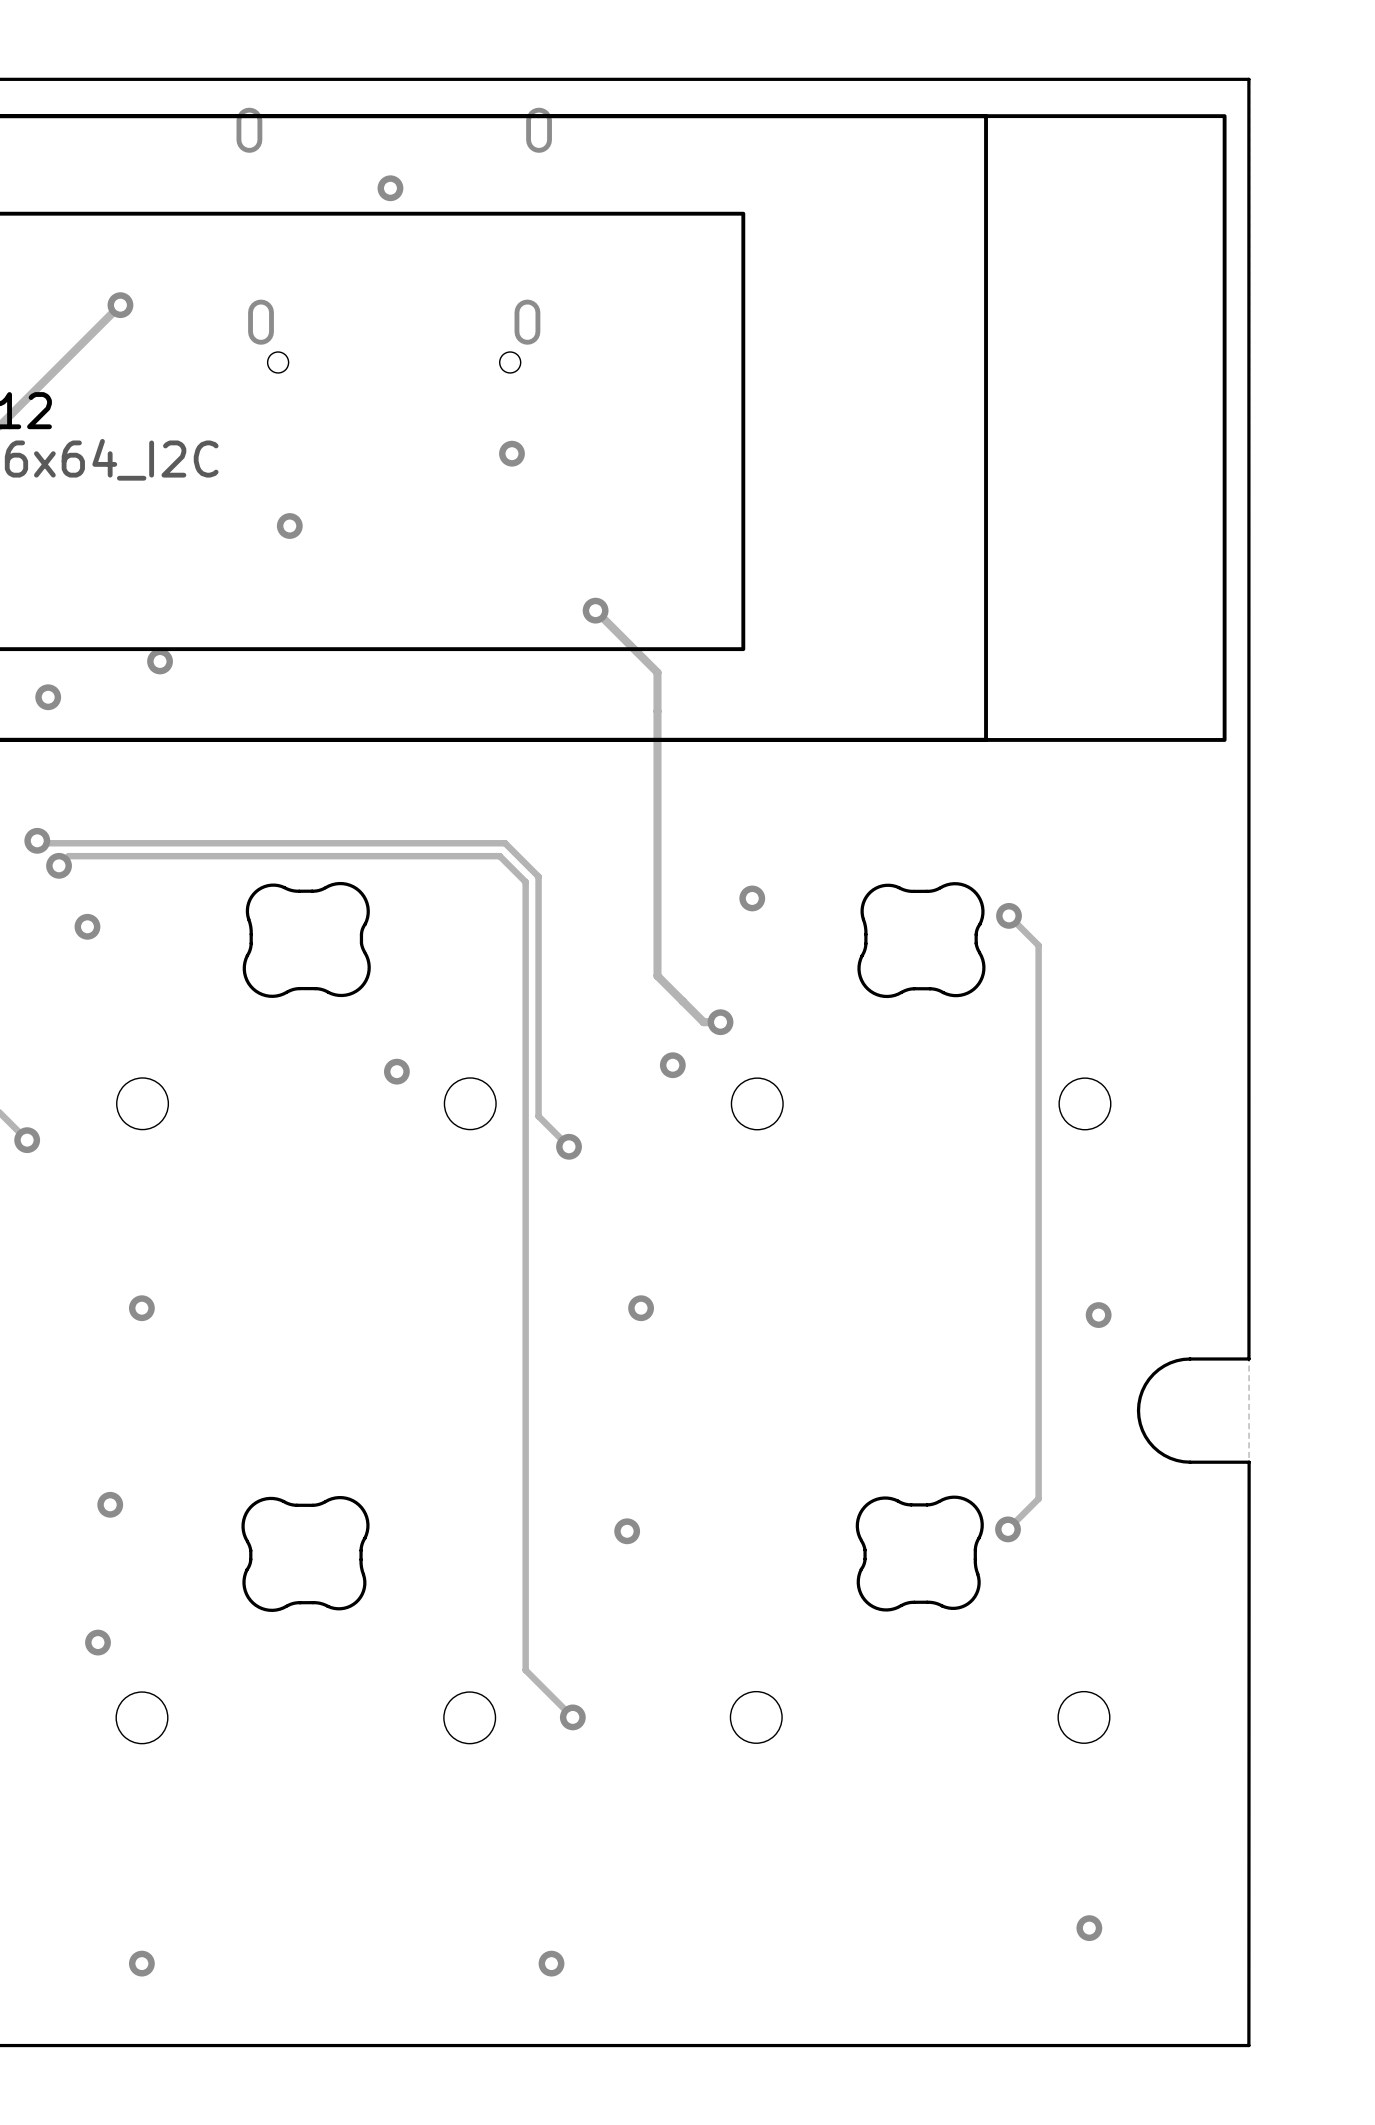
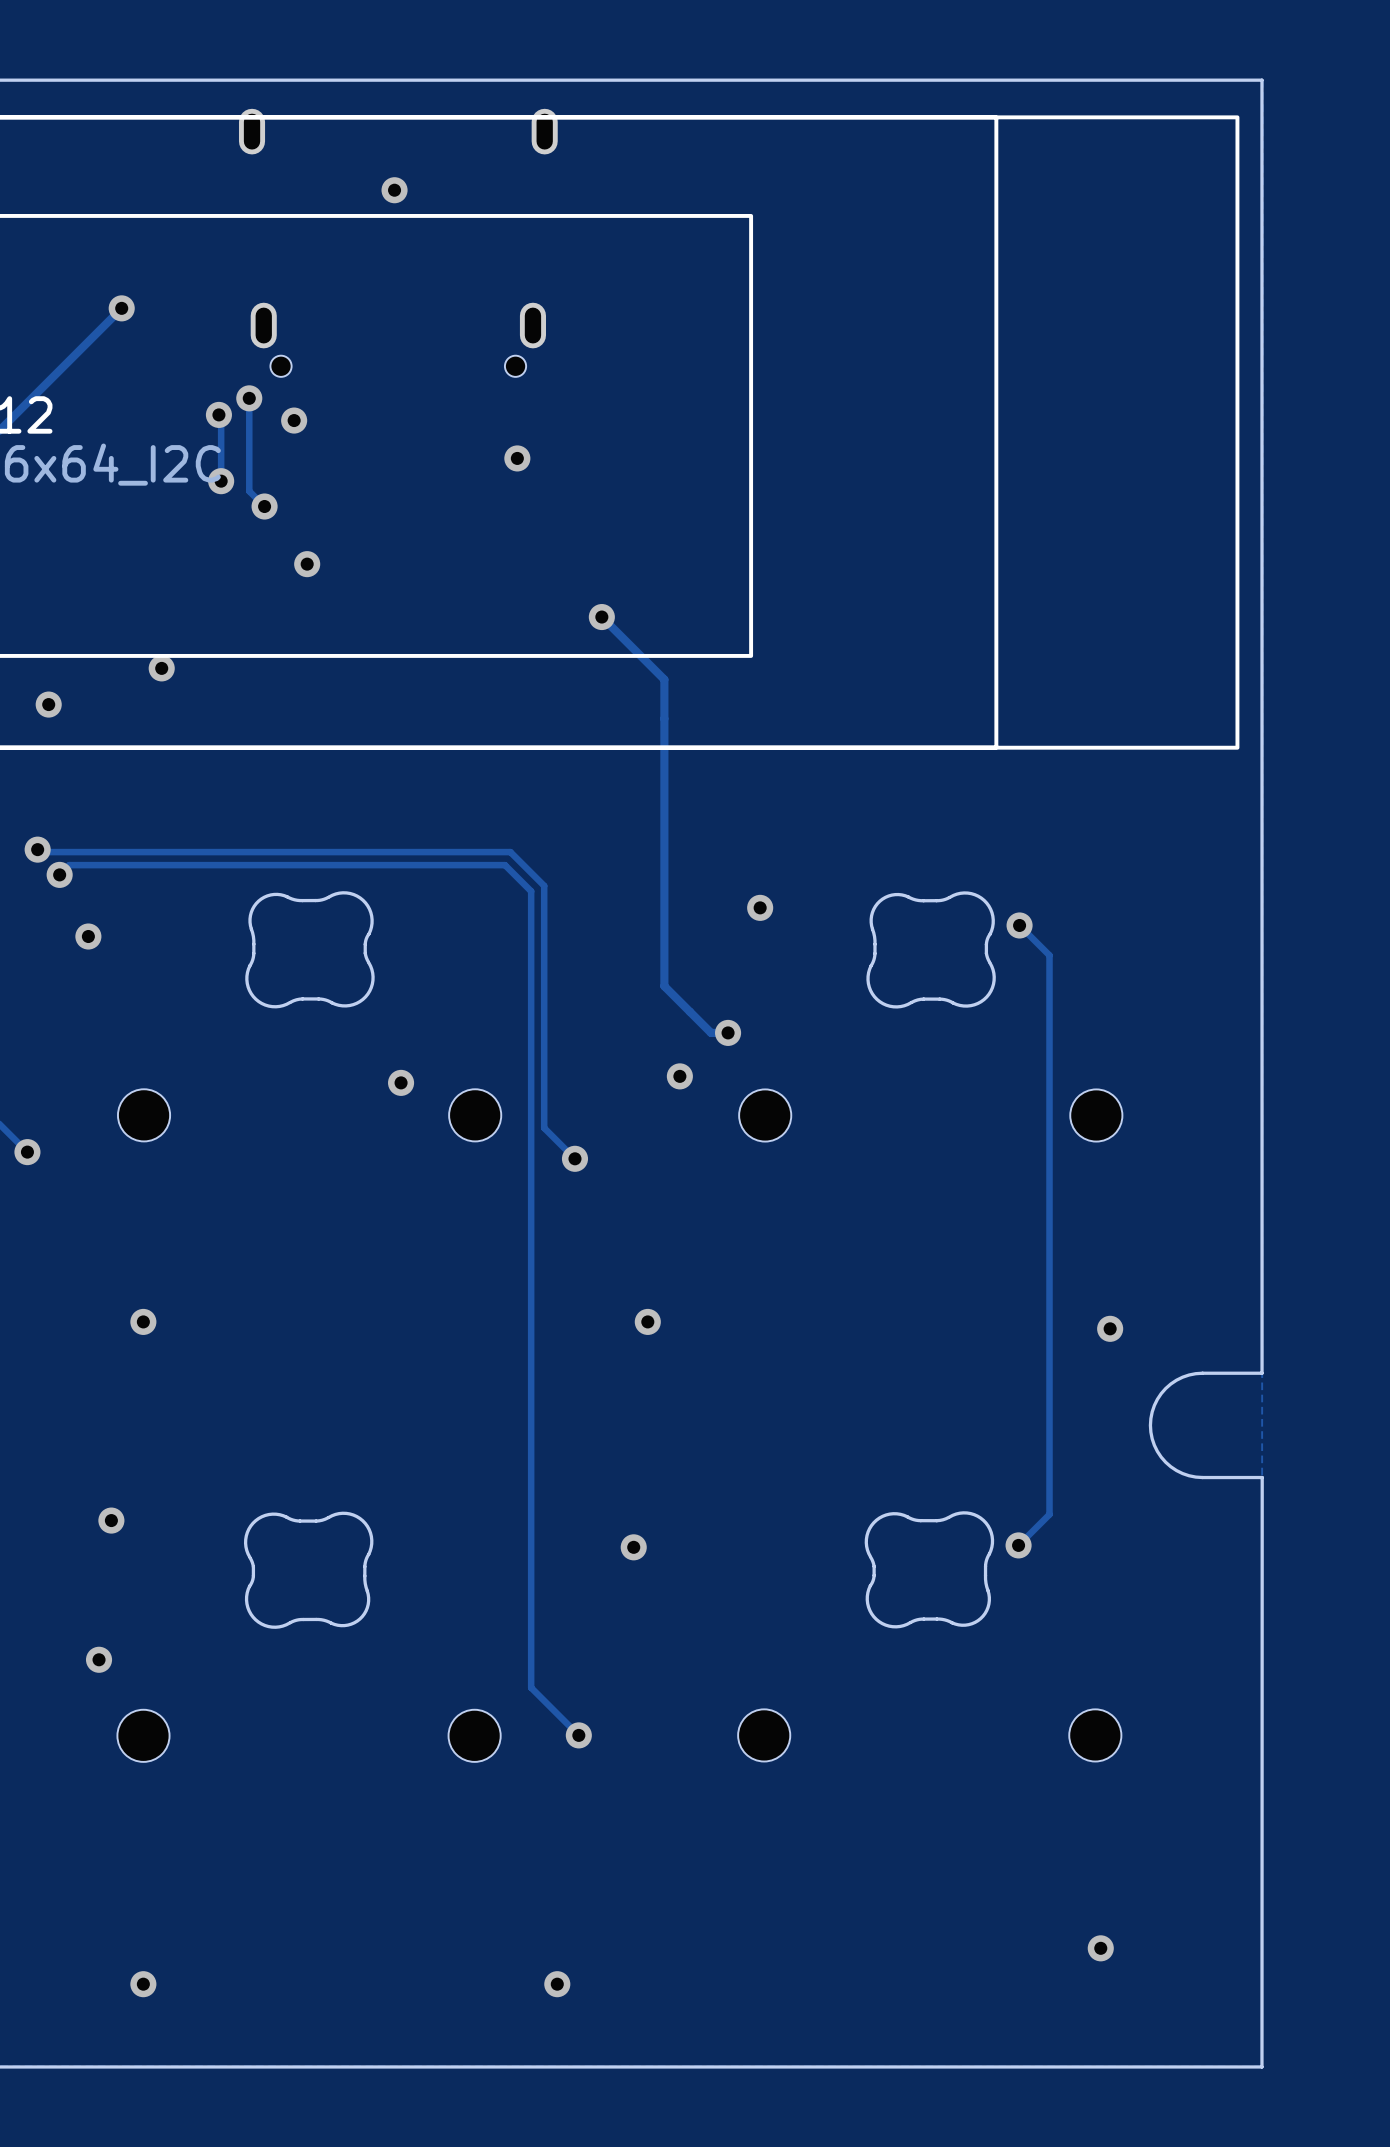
track: none -> (249, 398) (249, 491) (264, 506)
via: none -> (249, 398)
track: none -> (218, 414) (221, 417) (221, 481)
via: none -> (218, 414)
via: none -> (294, 420)
via: none -> (221, 481)
via: none -> (264, 506)
via: (289, 526) -> none
via: none -> (307, 564)

